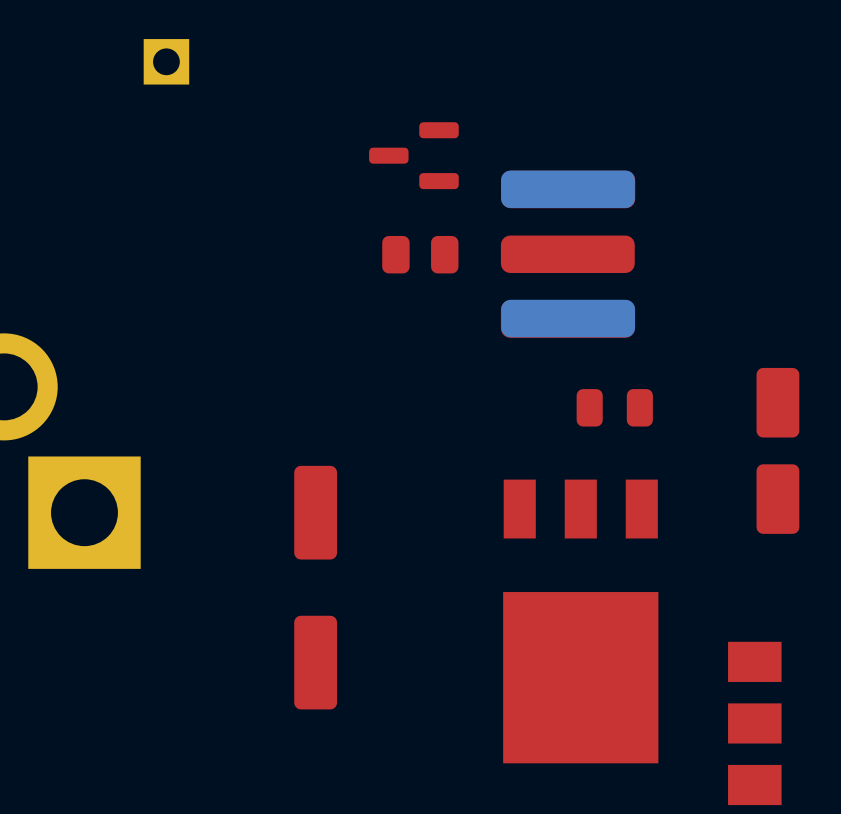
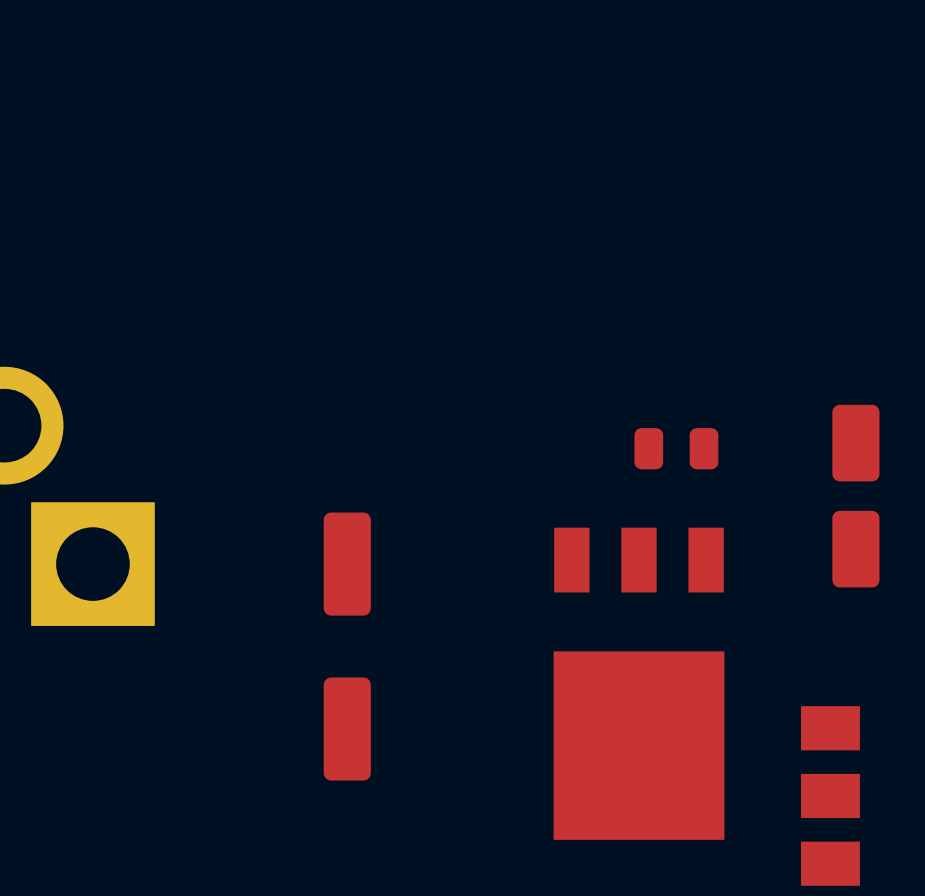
part: (166, 61) -> none
part: (413, 155) -> none
part: (420, 254) -> none
part: (568, 254) -> none

